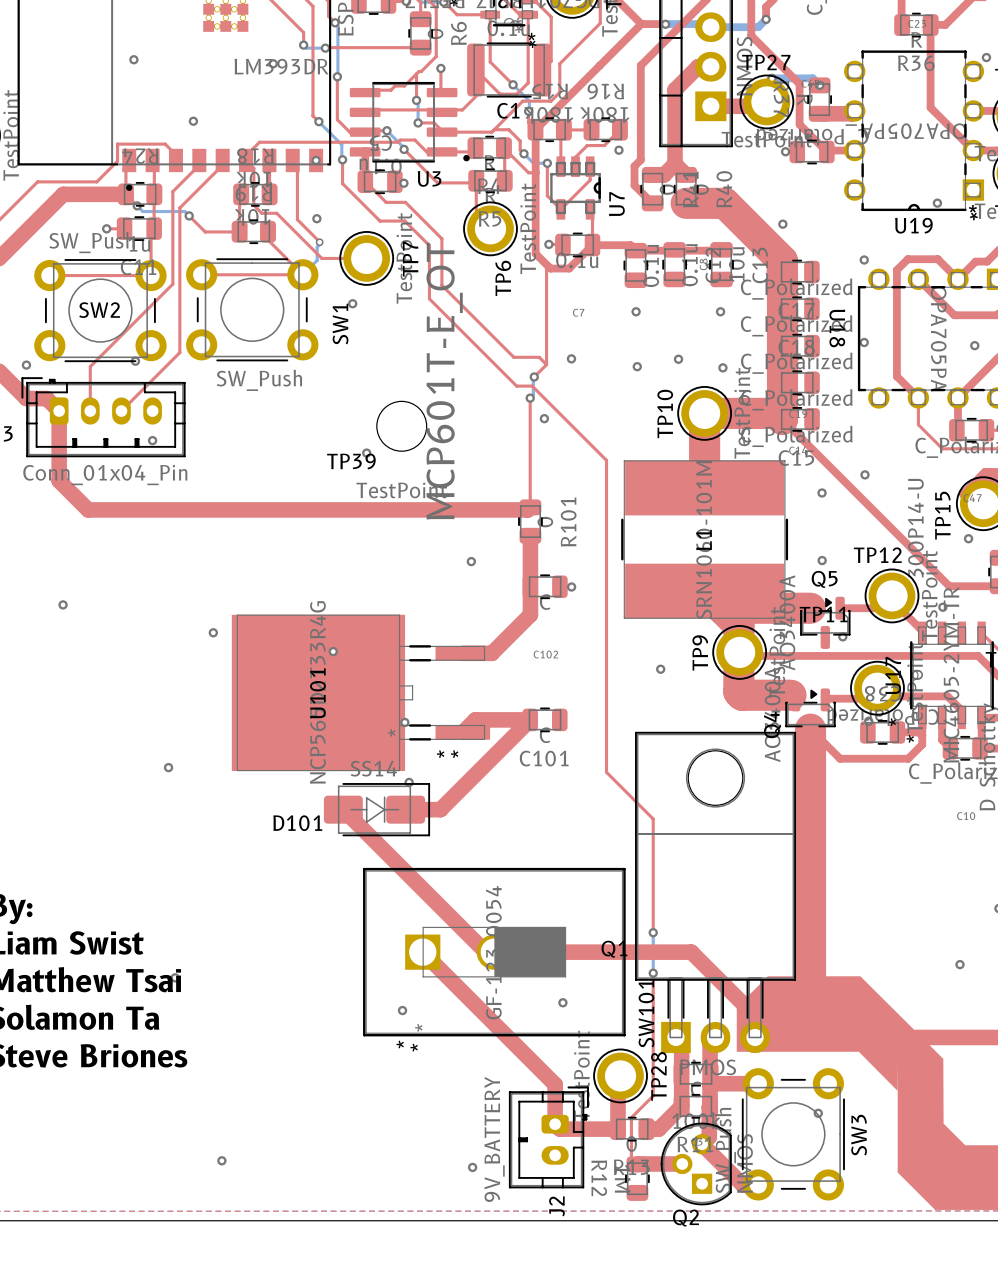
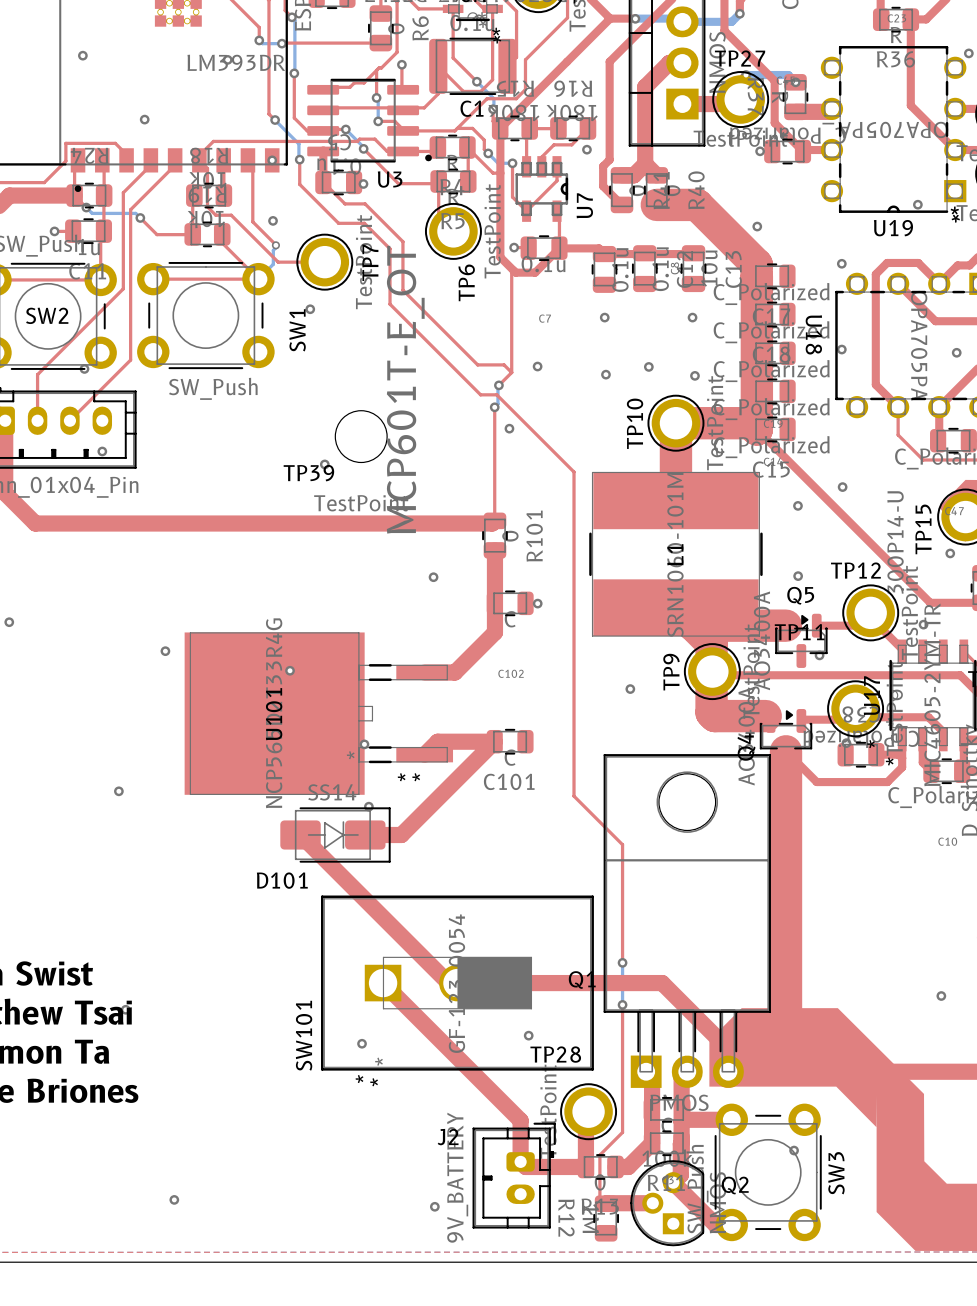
D101 name position: D101 (297, 823) -> D101 (282, 880)
SW101 name position: SW101 (646, 1013) -> SW101 (304, 1035)
TP28 name rotation: 0° (658, 1076) -> 90° clockwise (555, 1054)
TP28 name position: TP28 (658, 1076) -> TP28 (555, 1054)
J2 name rotation: 0° (556, 1206) -> 90° clockwise (448, 1137)
J2 name position: J2 (556, 1206) -> J2 (448, 1137)
Q2 name position: Q2 (685, 1218) -> Q2 (735, 1185)

